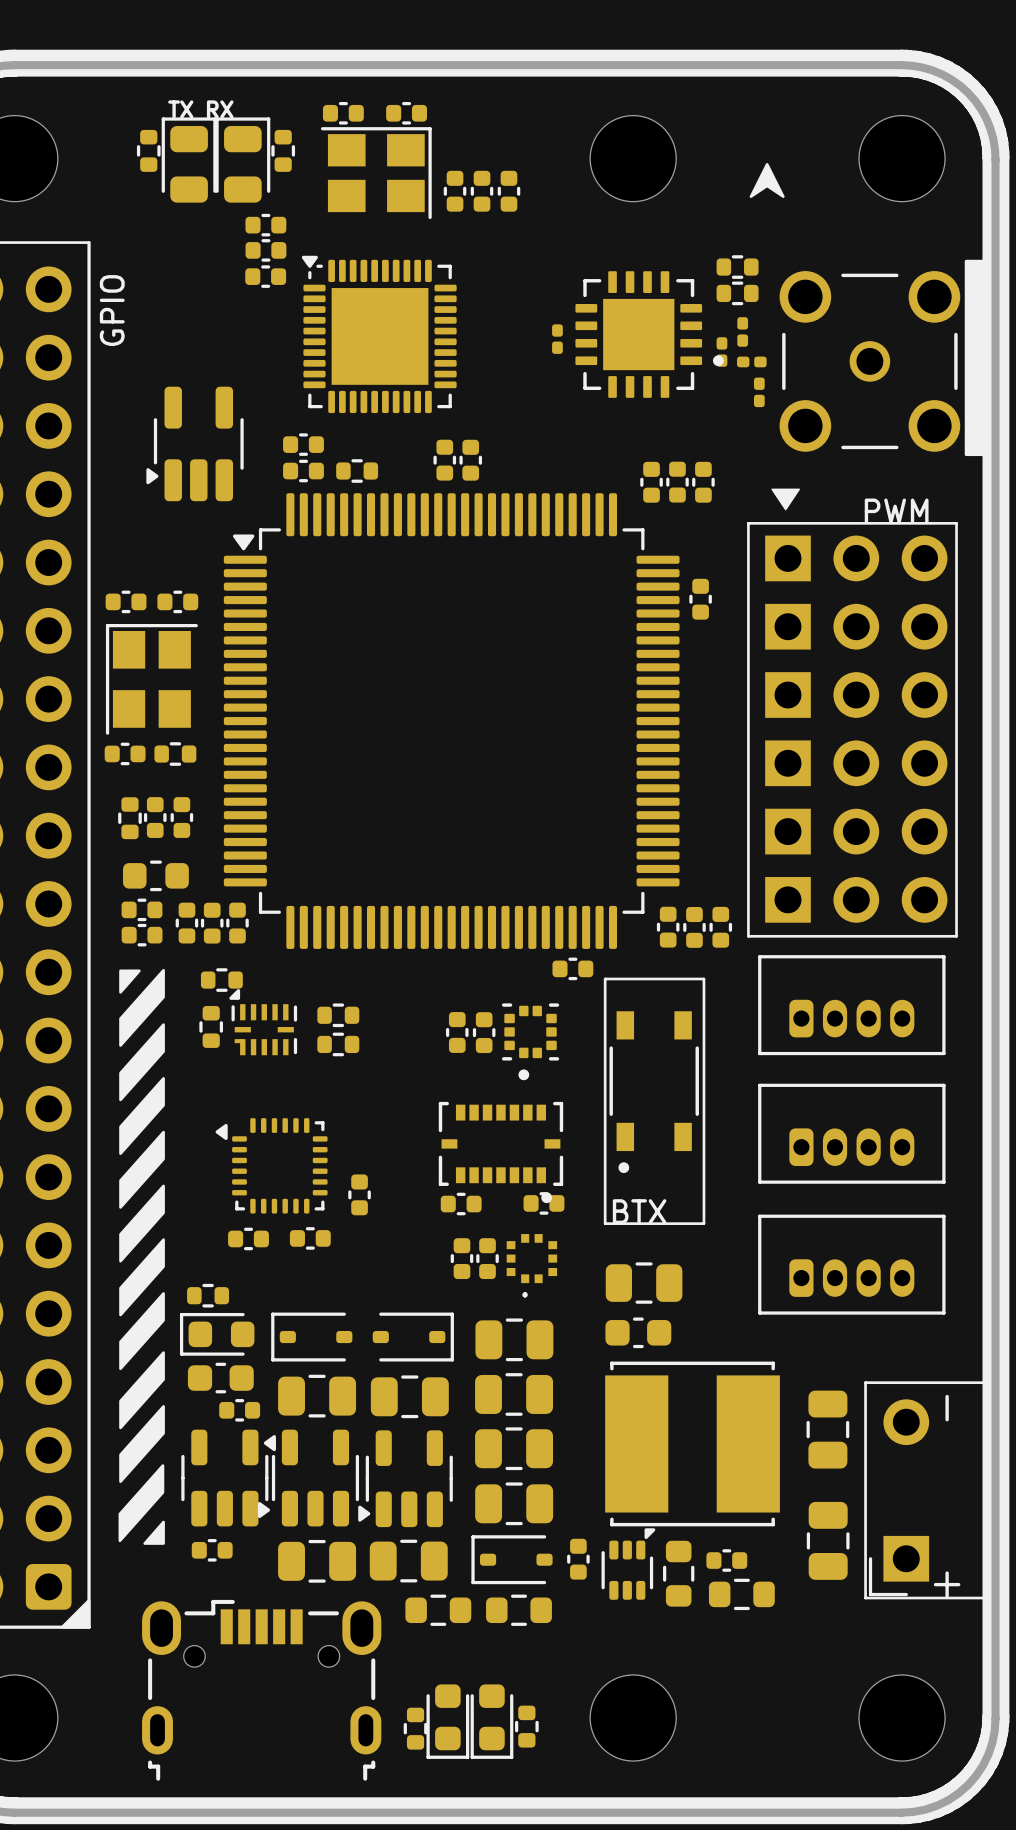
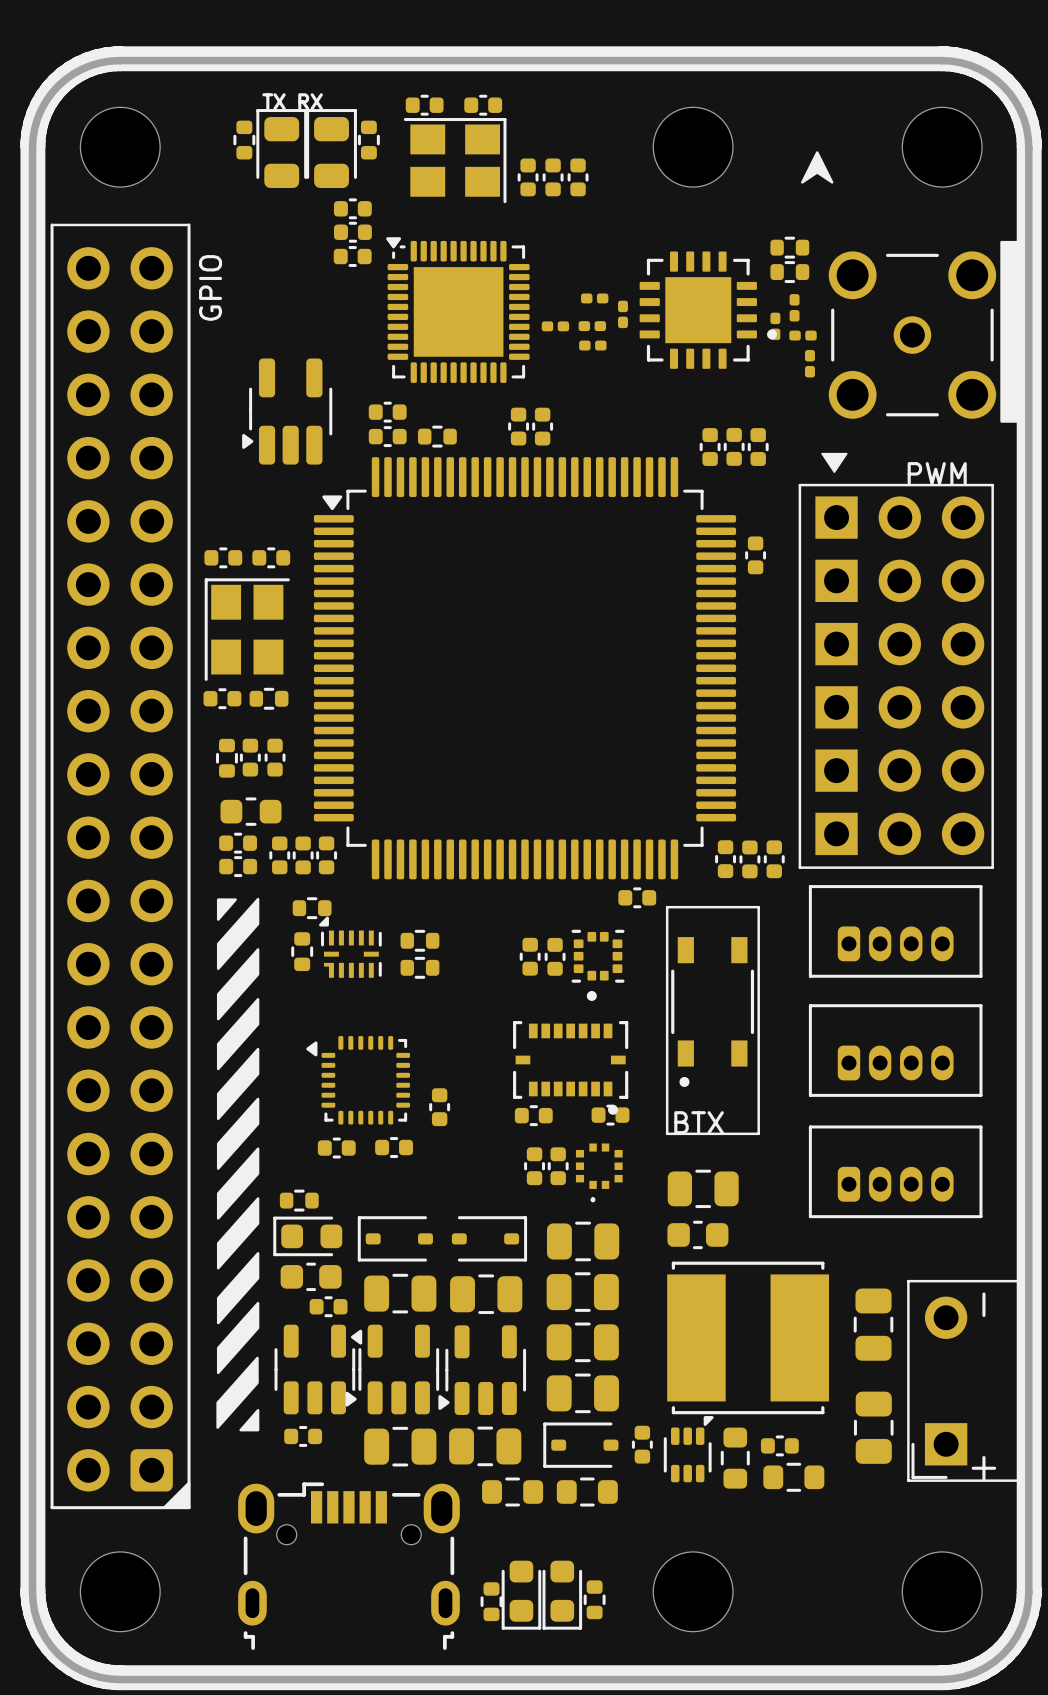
part: none -> (594, 298)
part: none -> (592, 326)
part: none -> (555, 326)
part: none -> (592, 345)

